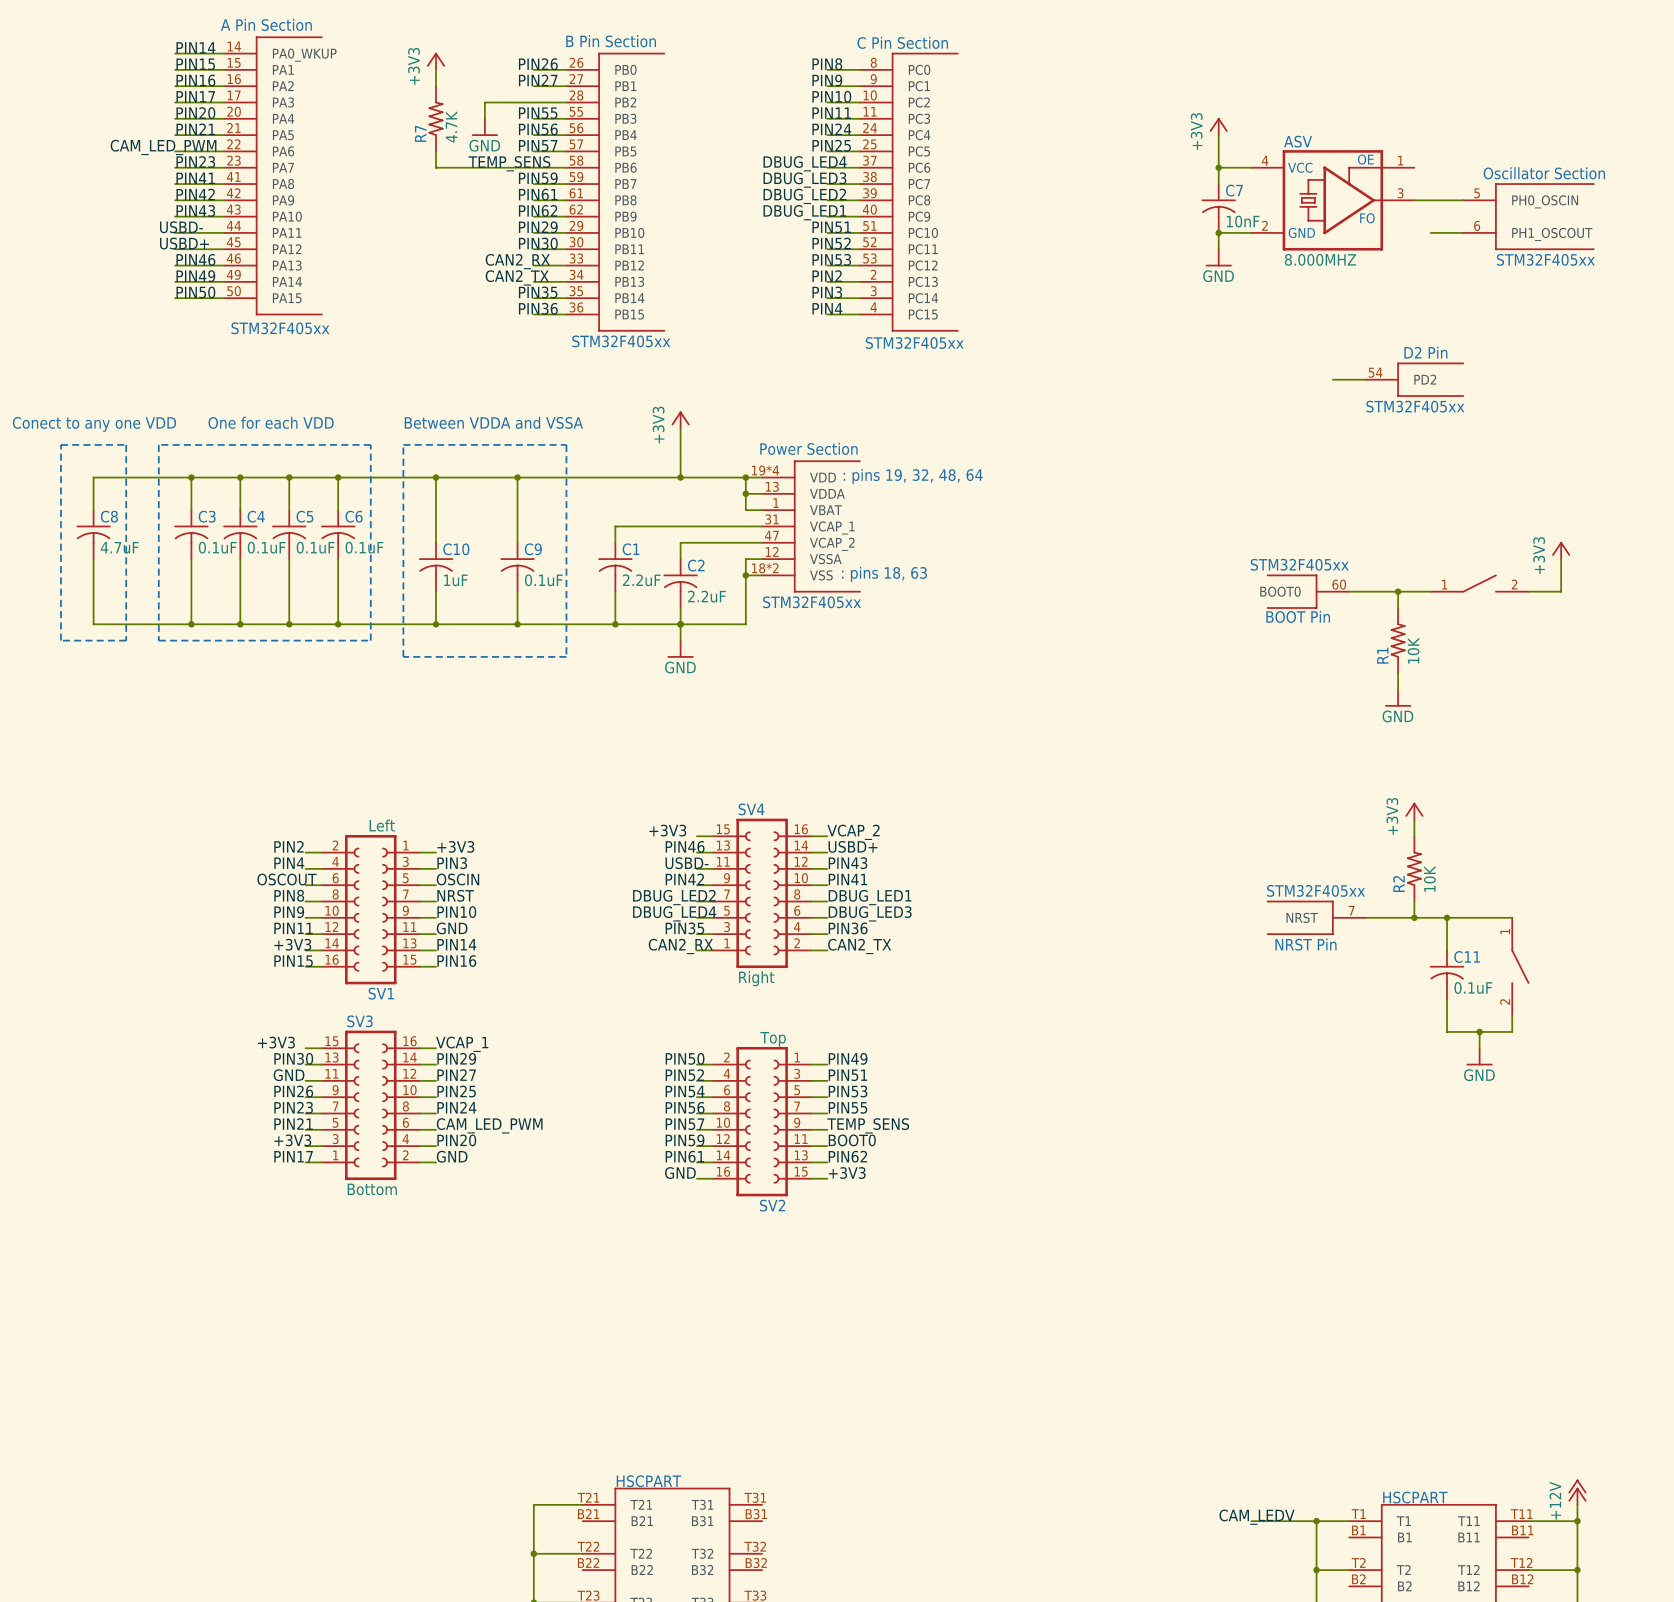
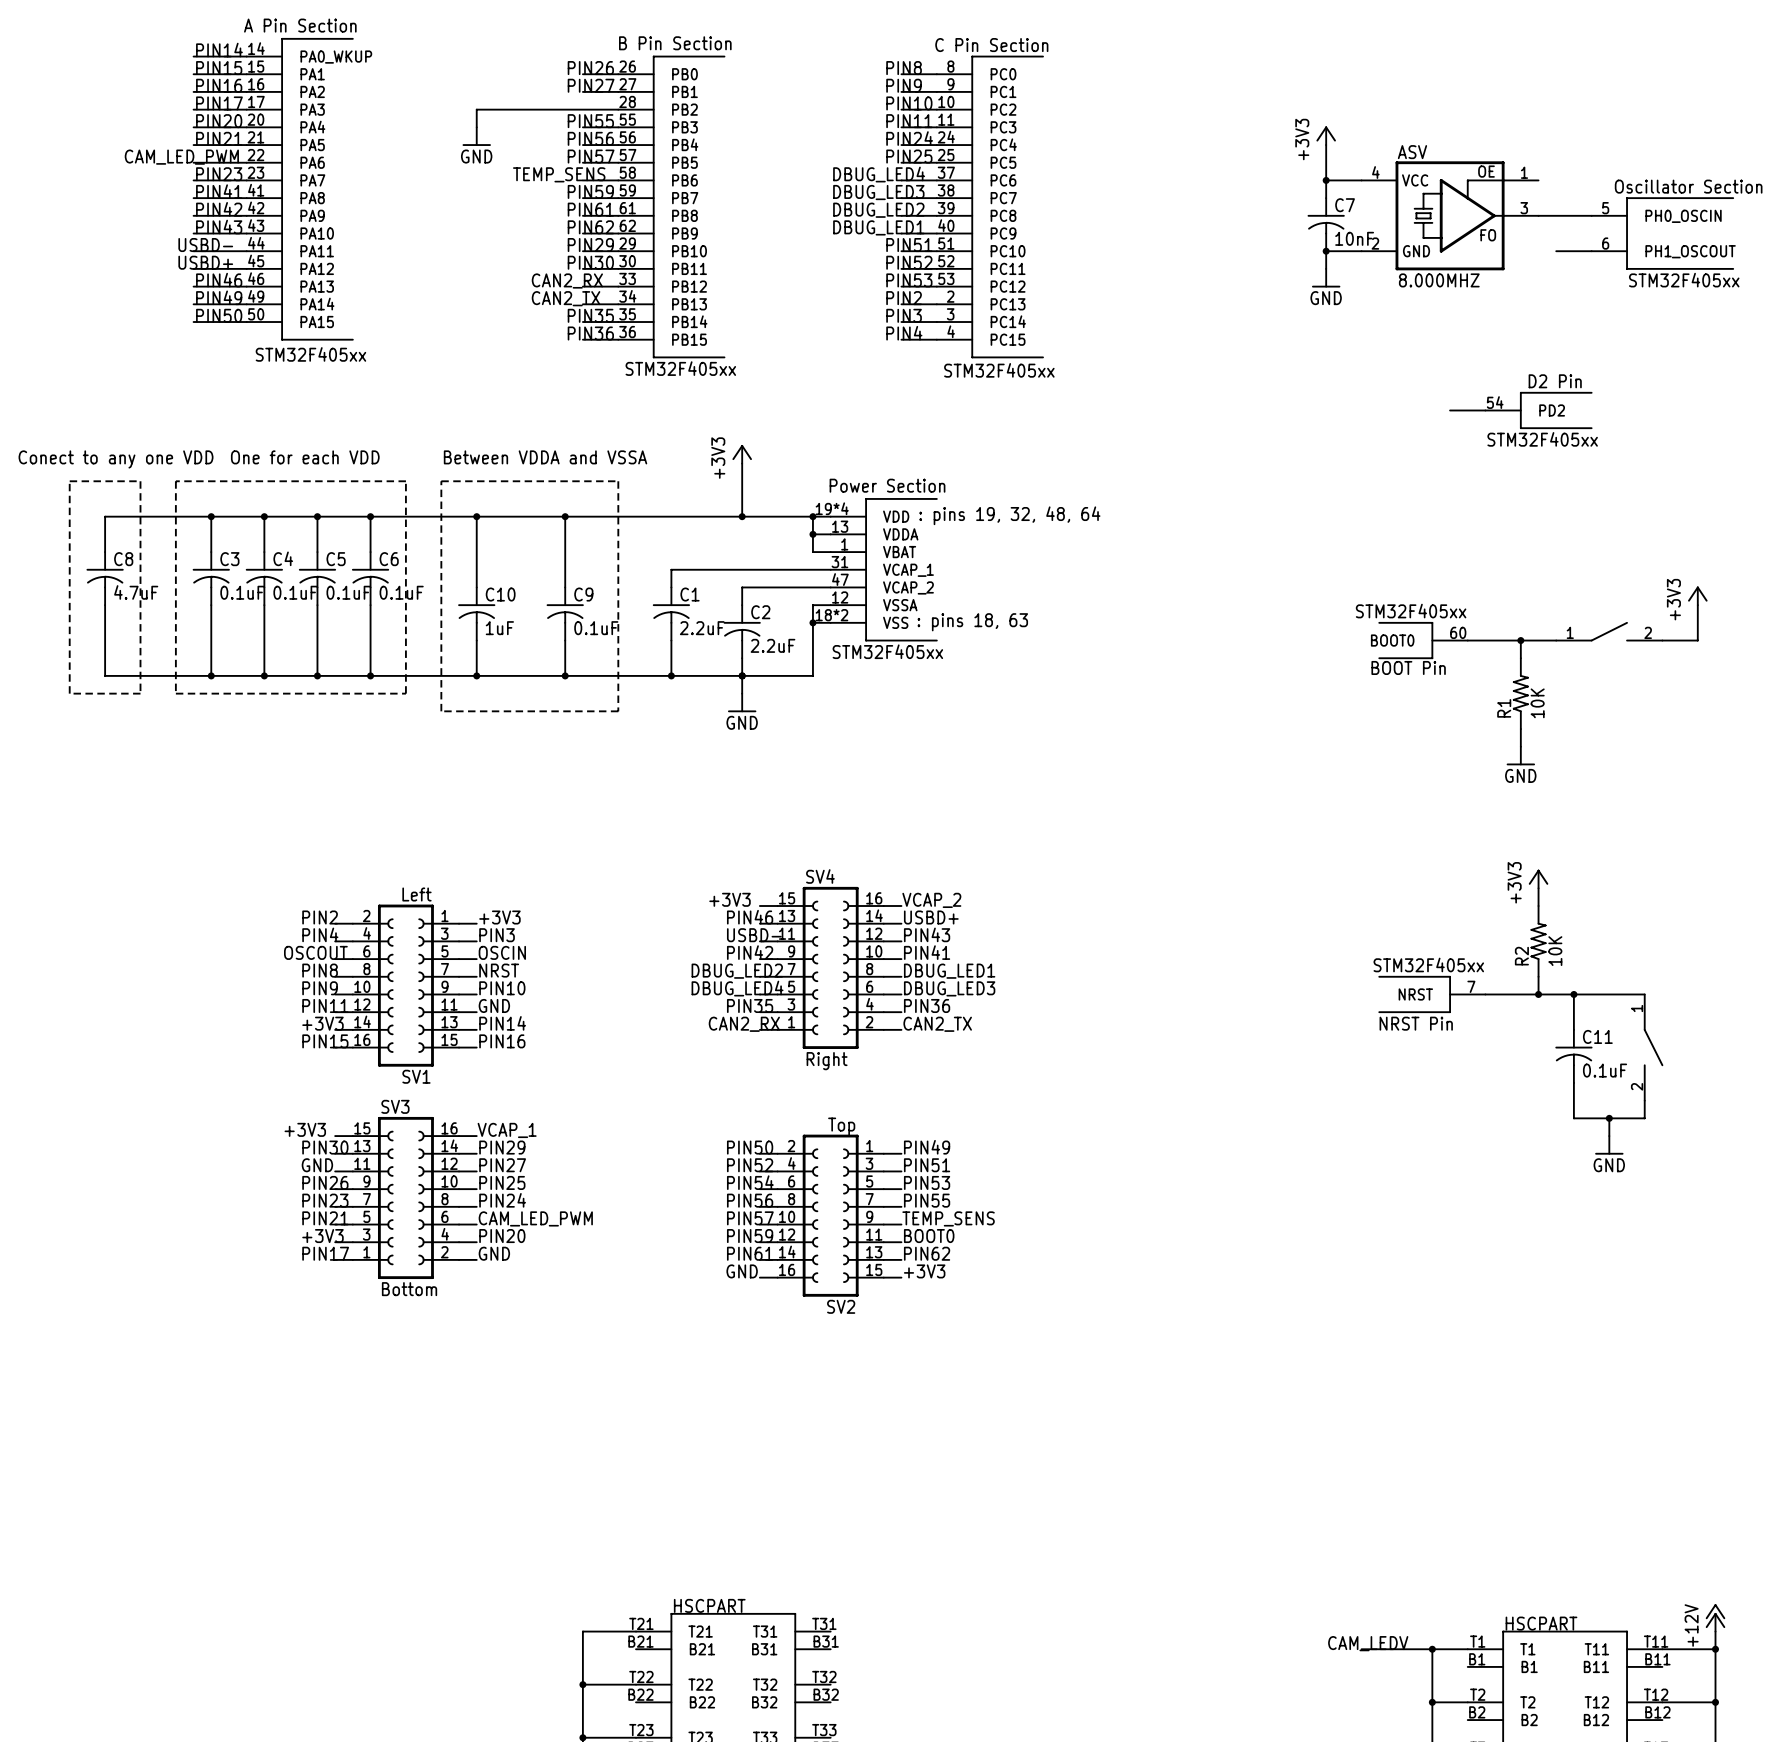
power symbol: +3V3 (436, 61) -> none
wire: (436, 69) (436, 86) -> none
wire: (484, 102) (484, 118) -> (529, 109) (476, 109) (476, 127)
R7: 4.7K (436, 118) -> none
power symbol position: GND (484, 127) -> GND (476, 136)
wire: (436, 151) (436, 167) (533, 167) -> none

